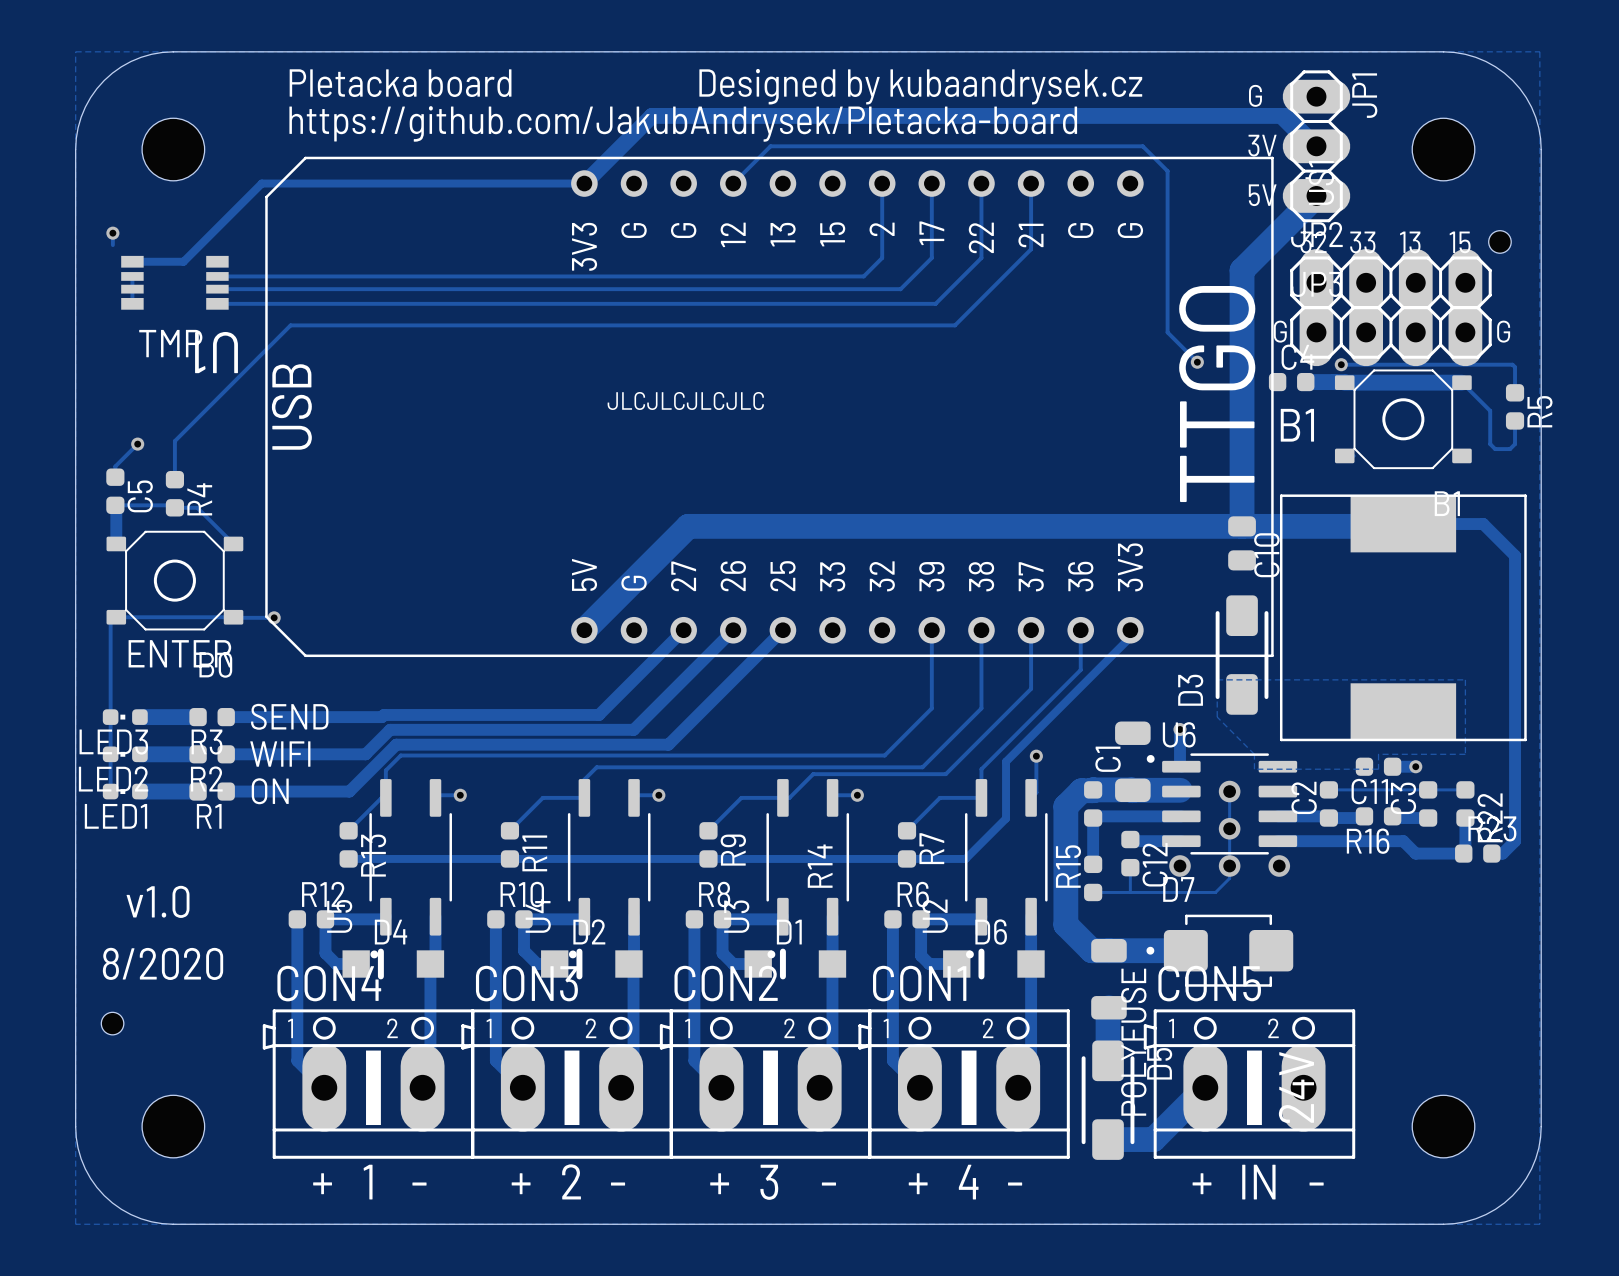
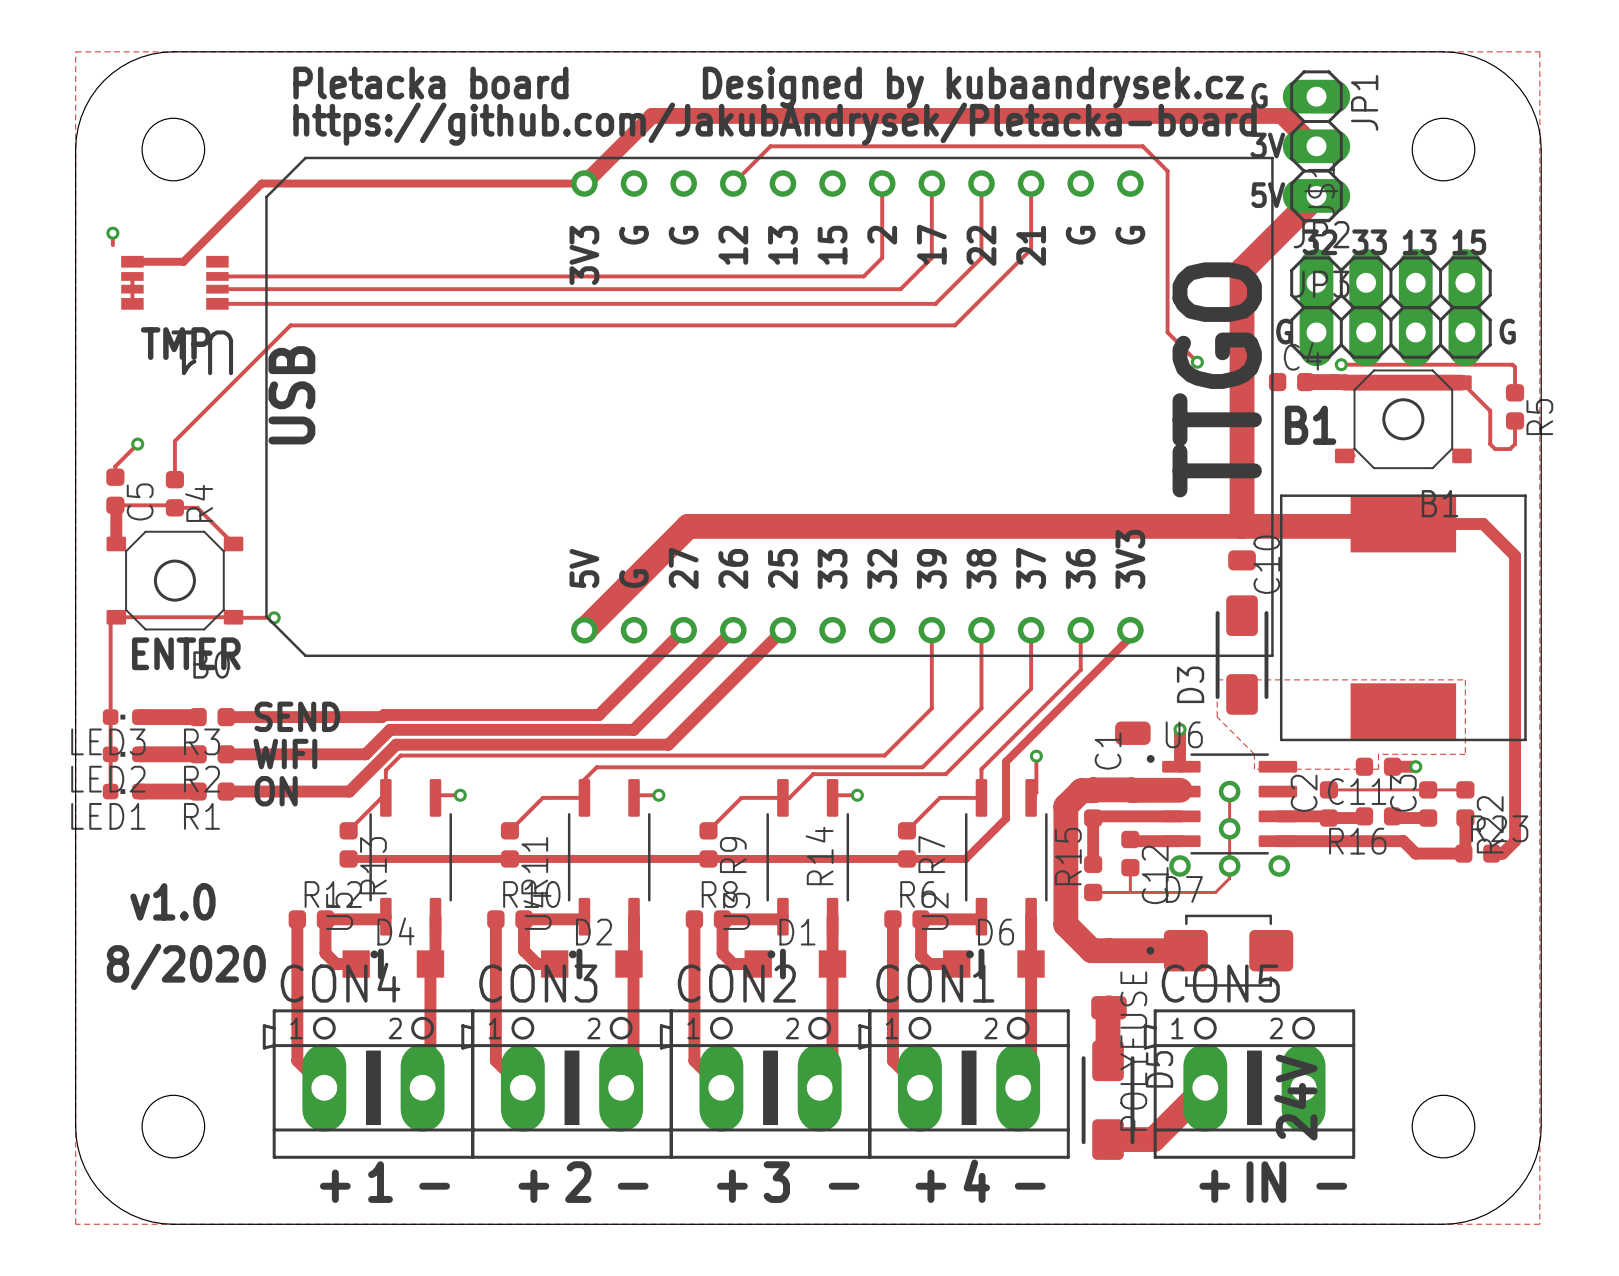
hole: (1499, 241) -> none
text: JLCJLCJLCJLC (685, 400) -> none
hole: (112, 1023) -> none

